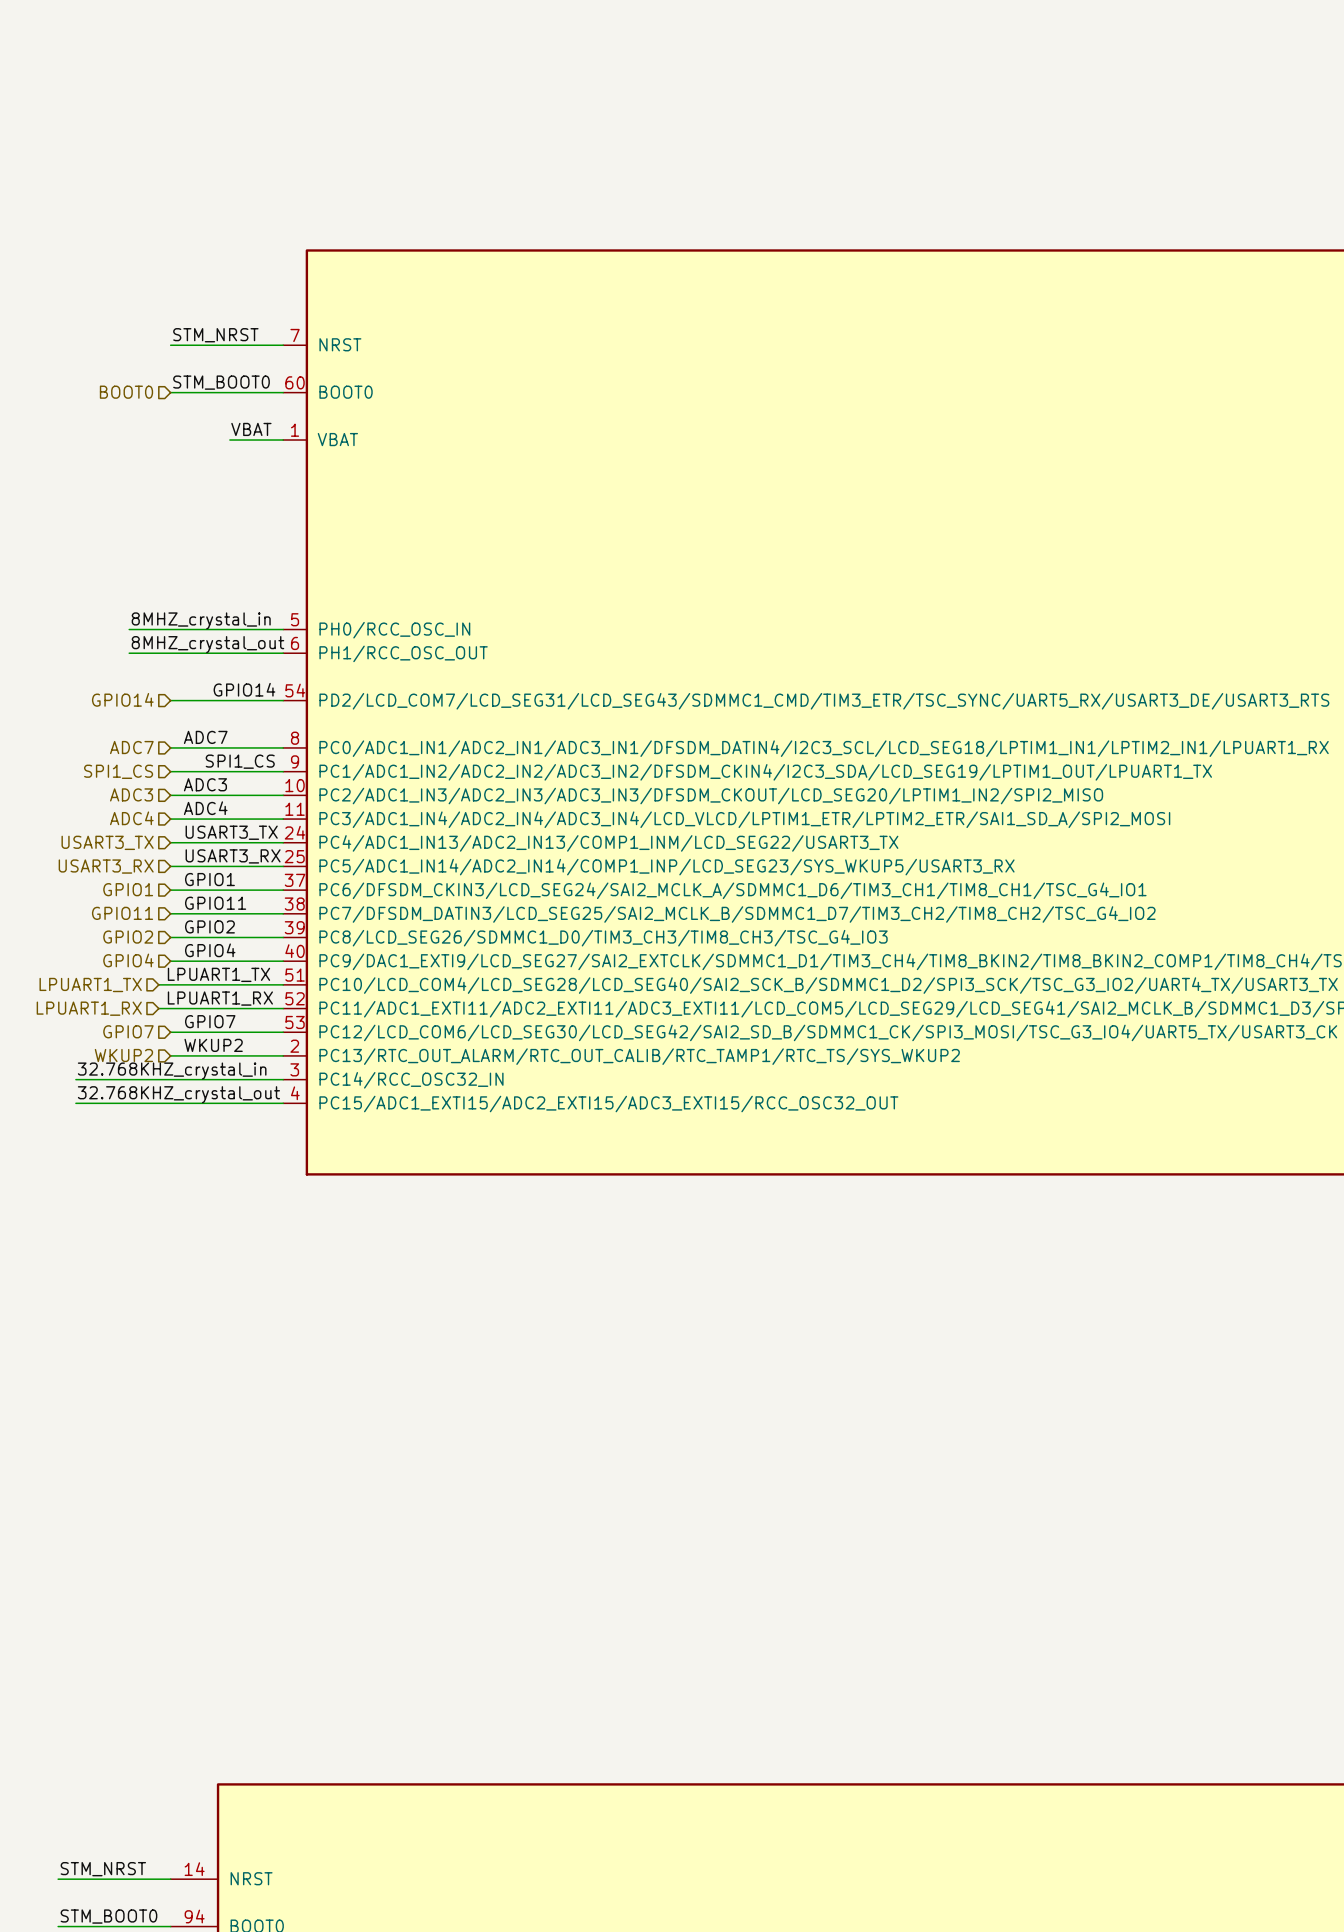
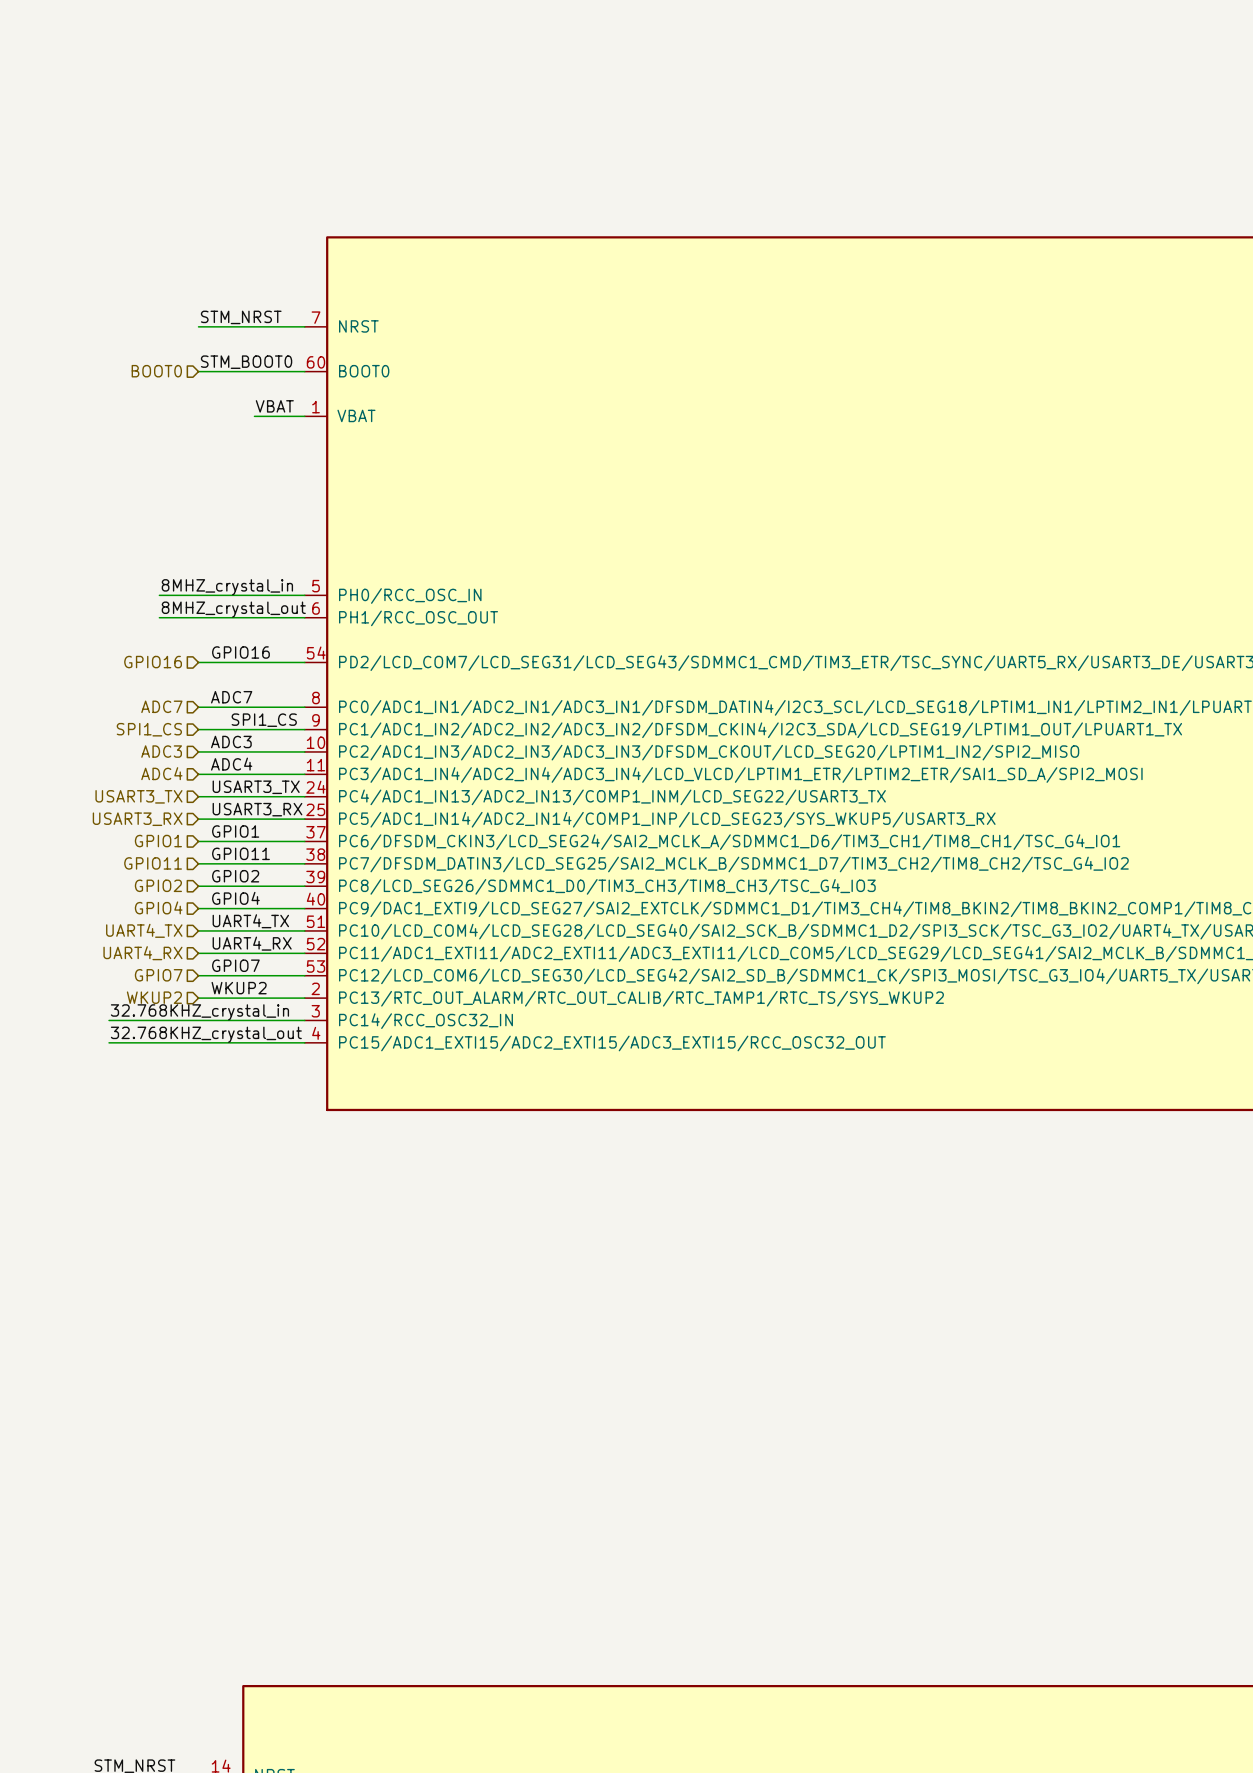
label: GPIO14 (244, 689) -> GPIO16 (240, 652)
hierarchical label: GPIO14 (122, 699) -> GPIO16 (153, 662)
label: LPUART1_TX (218, 974) -> none
label: none -> UART4_TX (250, 921)
wire: (158, 984) (170, 984) -> none
hierarchical label: LPUART1_TX (90, 985) -> UART4_TX (144, 930)
label: LPUART1_RX (220, 998) -> none
label: none -> UART4_RX (252, 943)
hierarchical label: LPUART1_RX (89, 1008) -> UART4_RX (142, 953)
wire: (158, 1008) (170, 1008) -> none

